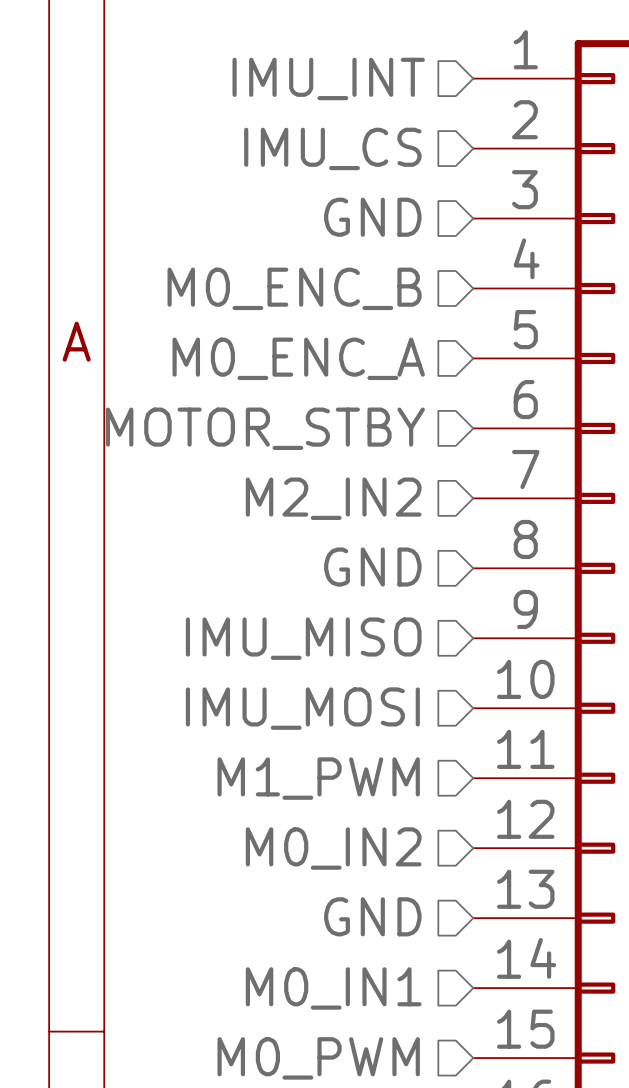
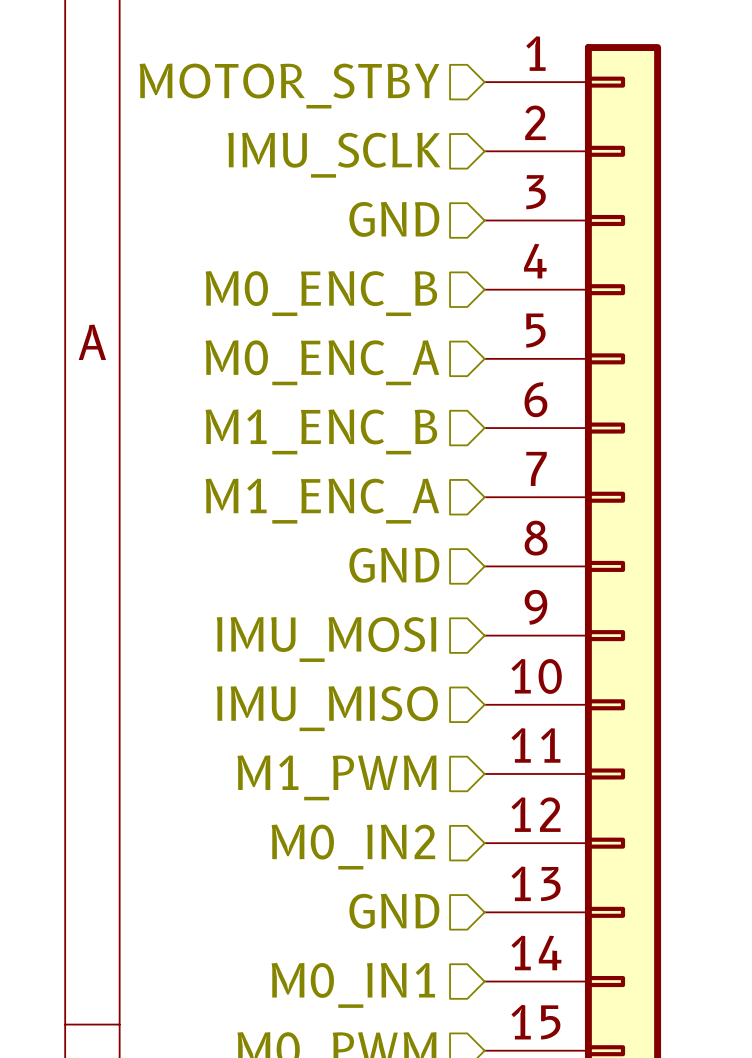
hierarchical label: IMU_INT (328, 78) -> MOTOR_STBY (289, 86)
hierarchical label: IMU_CS (332, 148) -> IMU_SCLK (334, 155)
hierarchical label: MOTOR_STBY (265, 428) -> M1_ENC_B (321, 431)
hierarchical label: M2_IN2 (333, 498) -> M1_ENC_A (322, 501)
hierarchical label: IMU_MISO (303, 638) -> IMU_MOSI (326, 639)
hierarchical label: IMU_MOSI (302, 708) -> IMU_MISO (327, 708)

